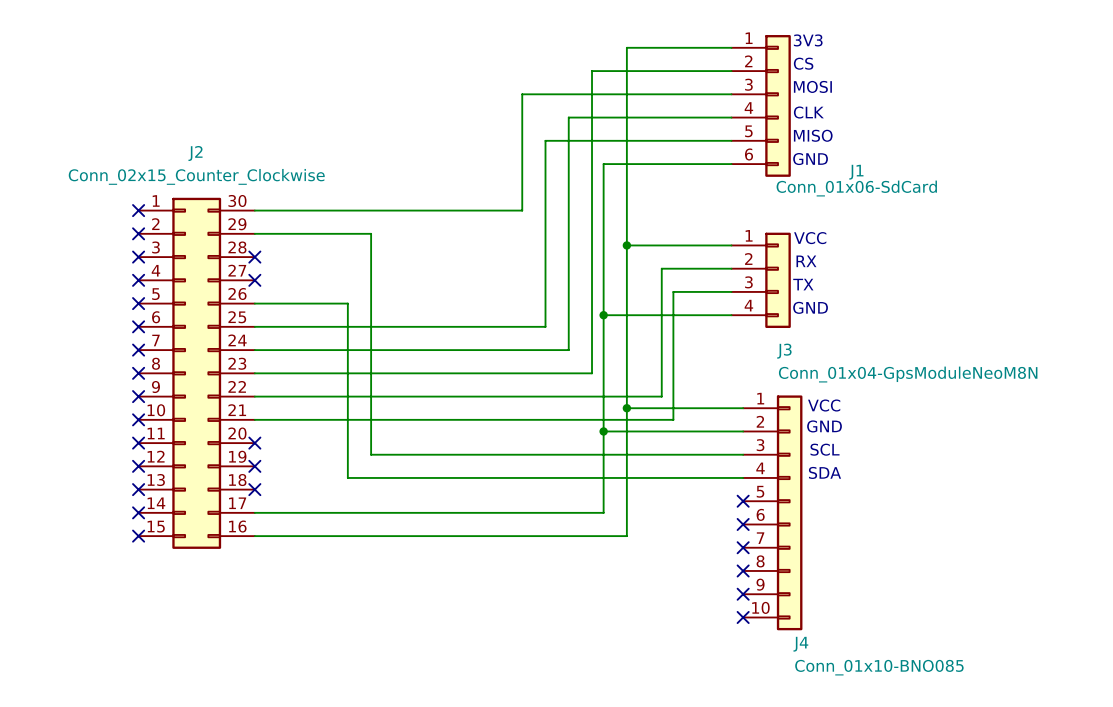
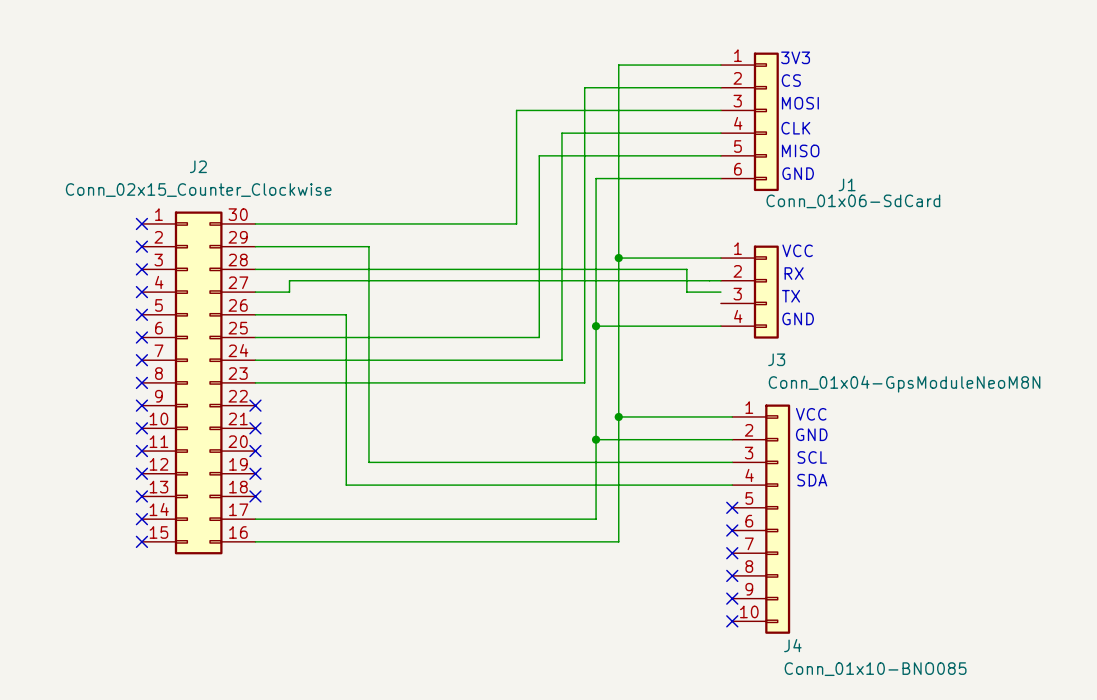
wire: none -> (255, 269) (686, 269) (686, 292) (720, 292)
no-connect mark: (254, 257) -> none
wire: (661, 268) (661, 396) (254, 396) -> (652, 280) (289, 280) (289, 292) (255, 292)
no-connect mark: (254, 280) -> none
wire: (731, 291) (673, 291) (673, 419) (254, 419) -> none
no-connect mark: none -> (255, 405)
no-connect mark: none -> (255, 428)

